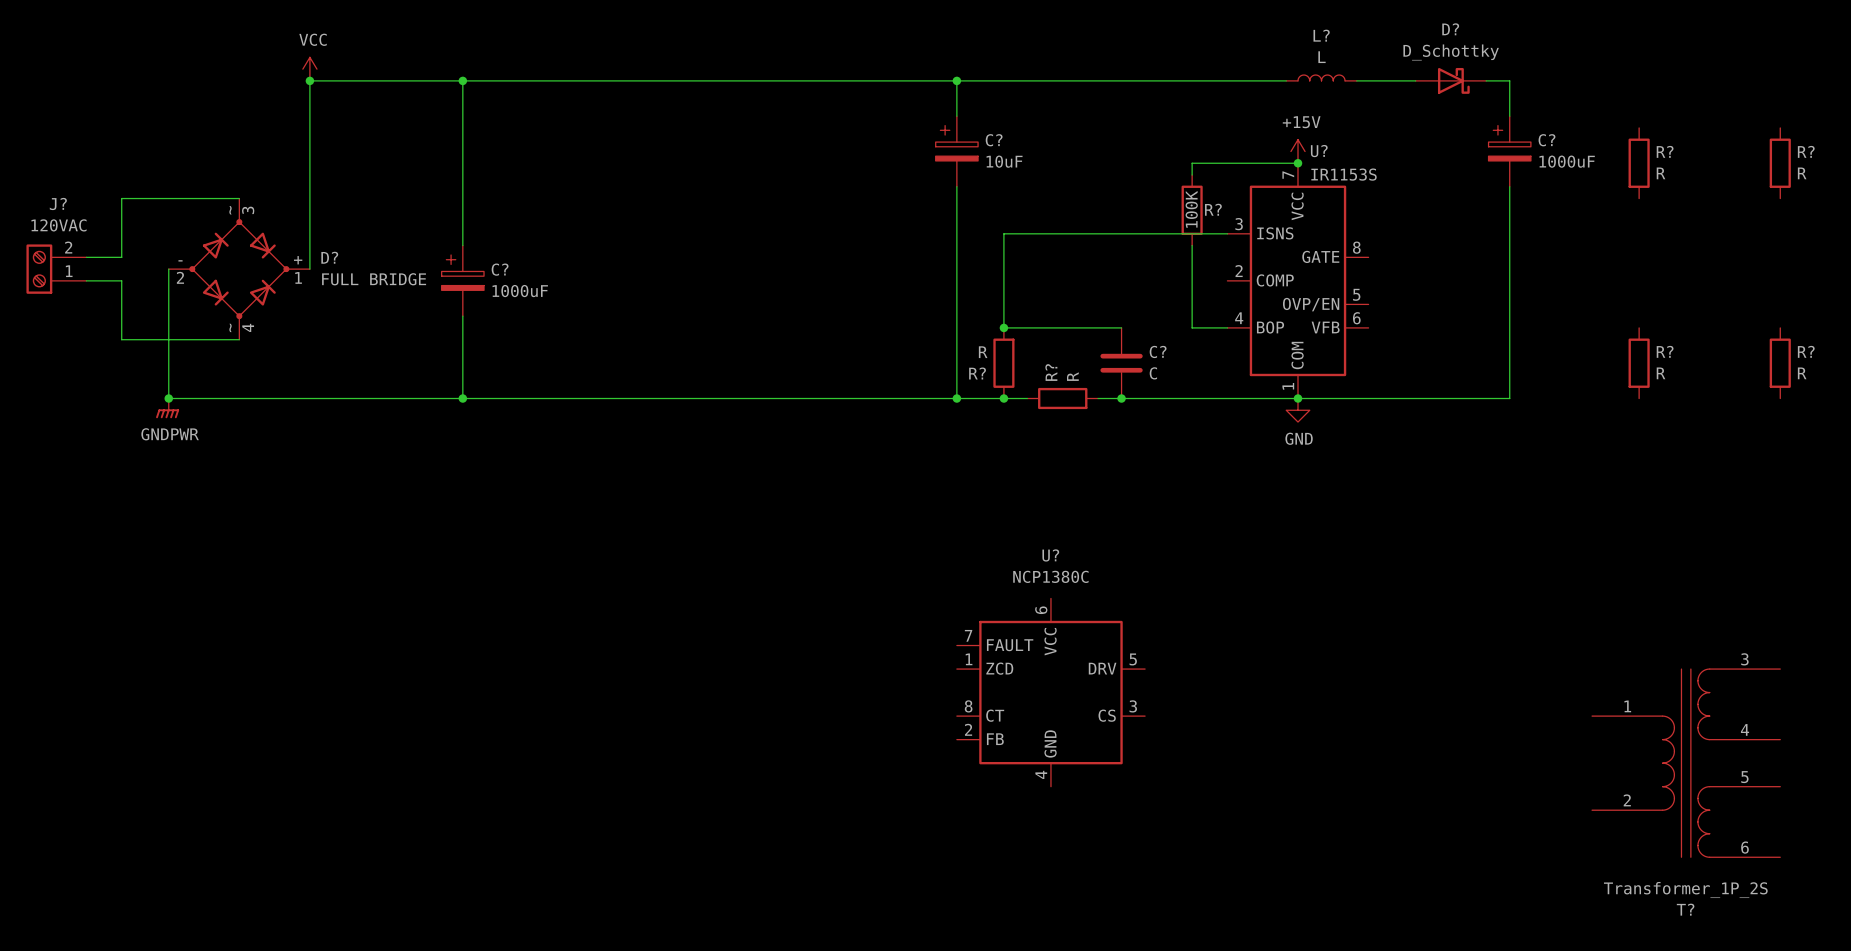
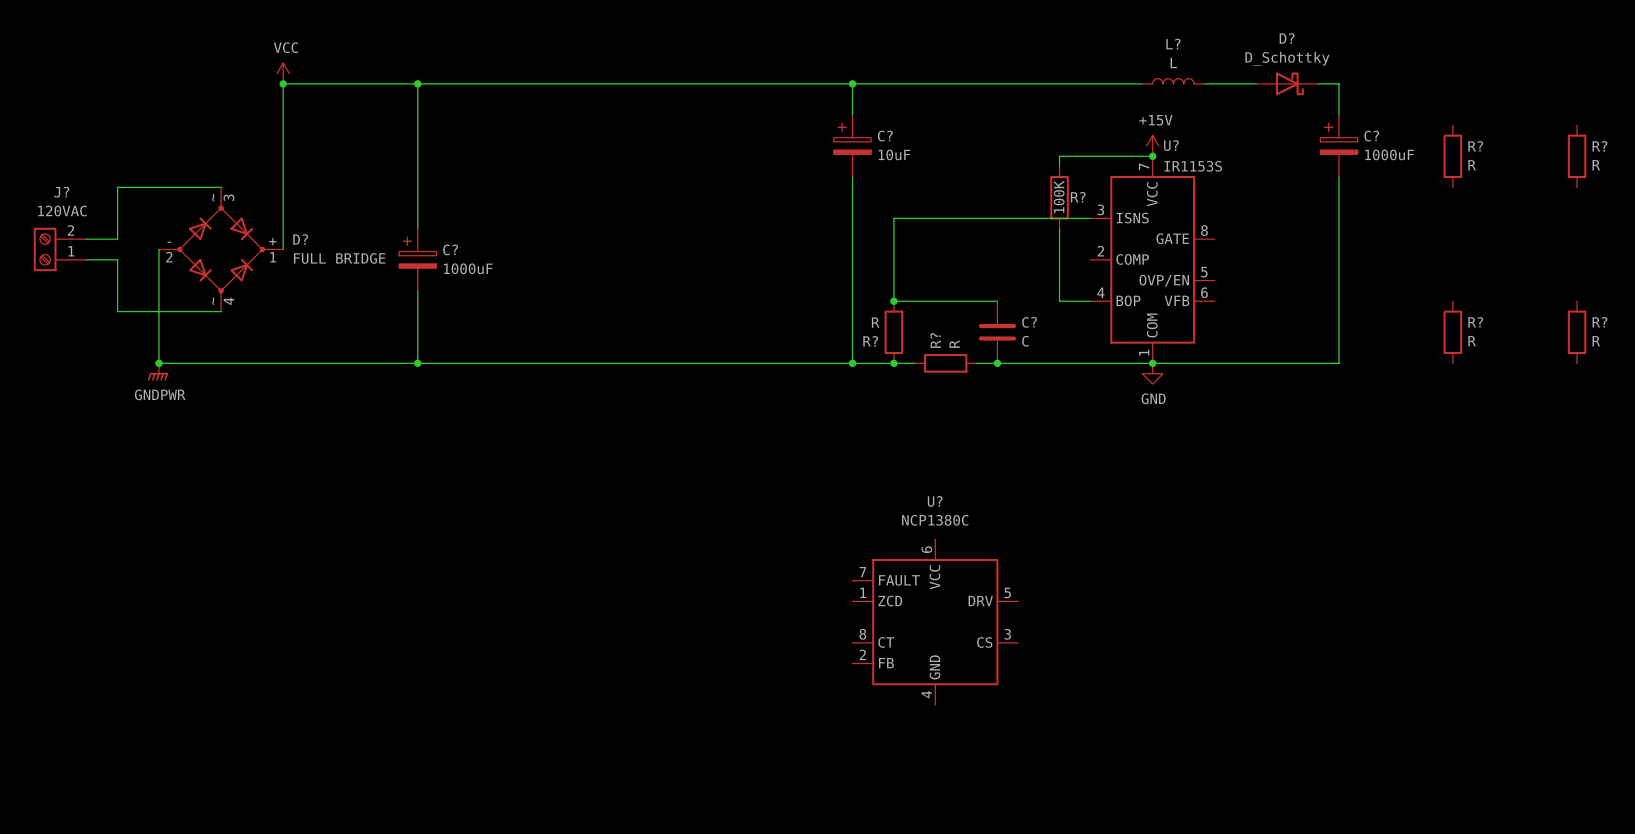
T?: Transformer_1P_2S (1686, 763) -> none

